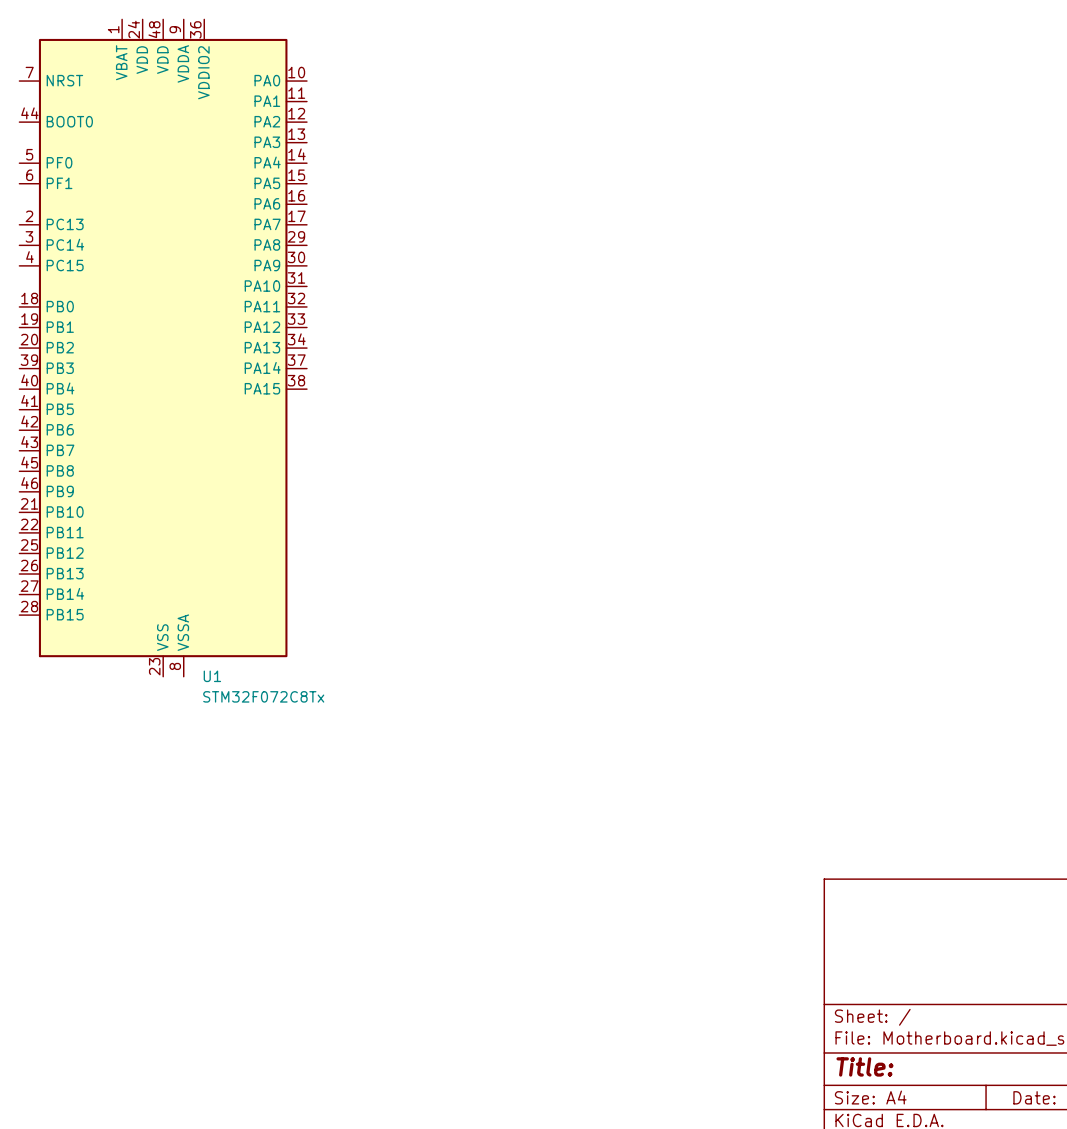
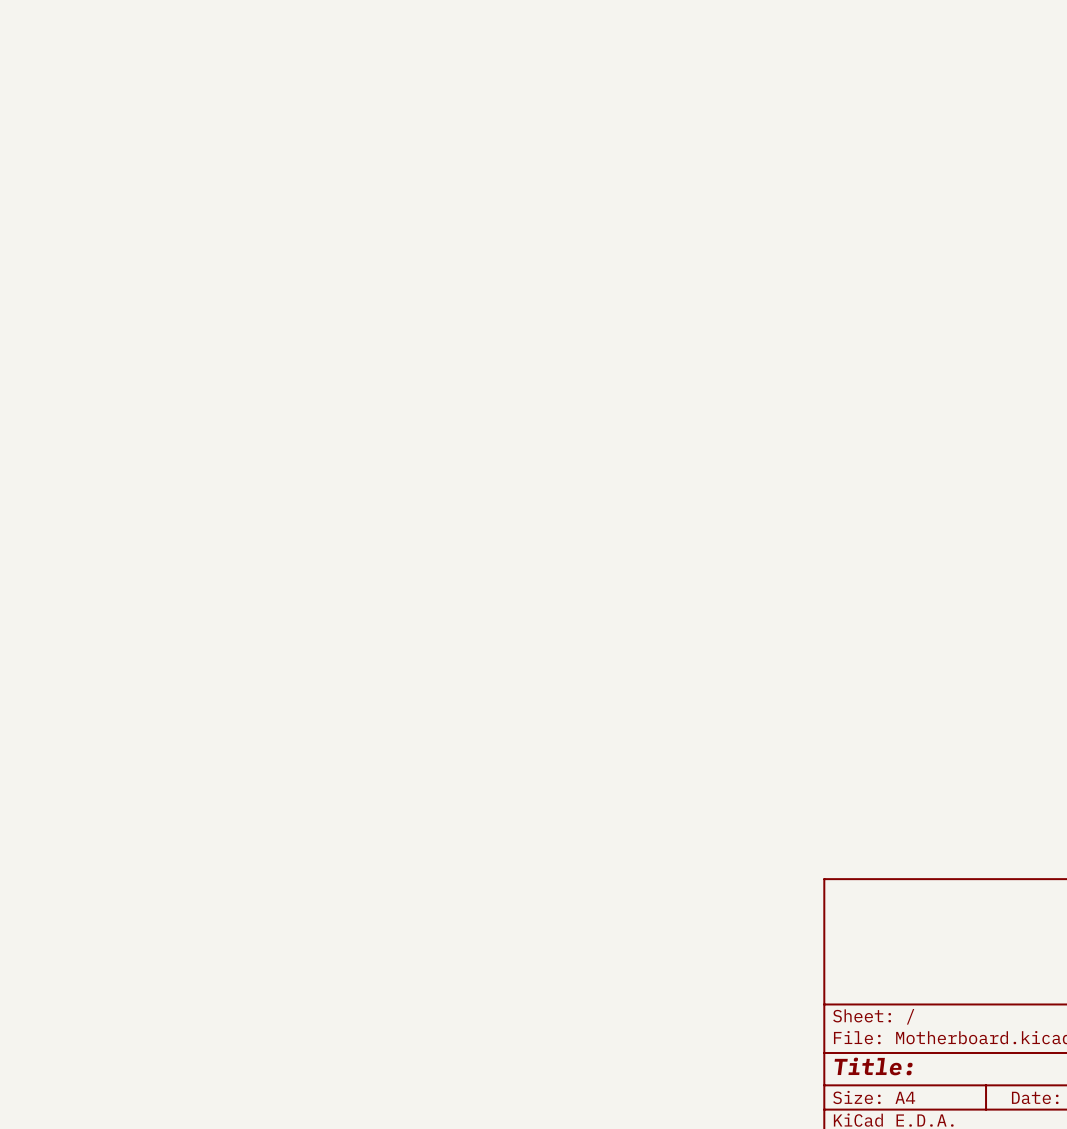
U1: STM32F072C8Tx (163, 348) -> none

